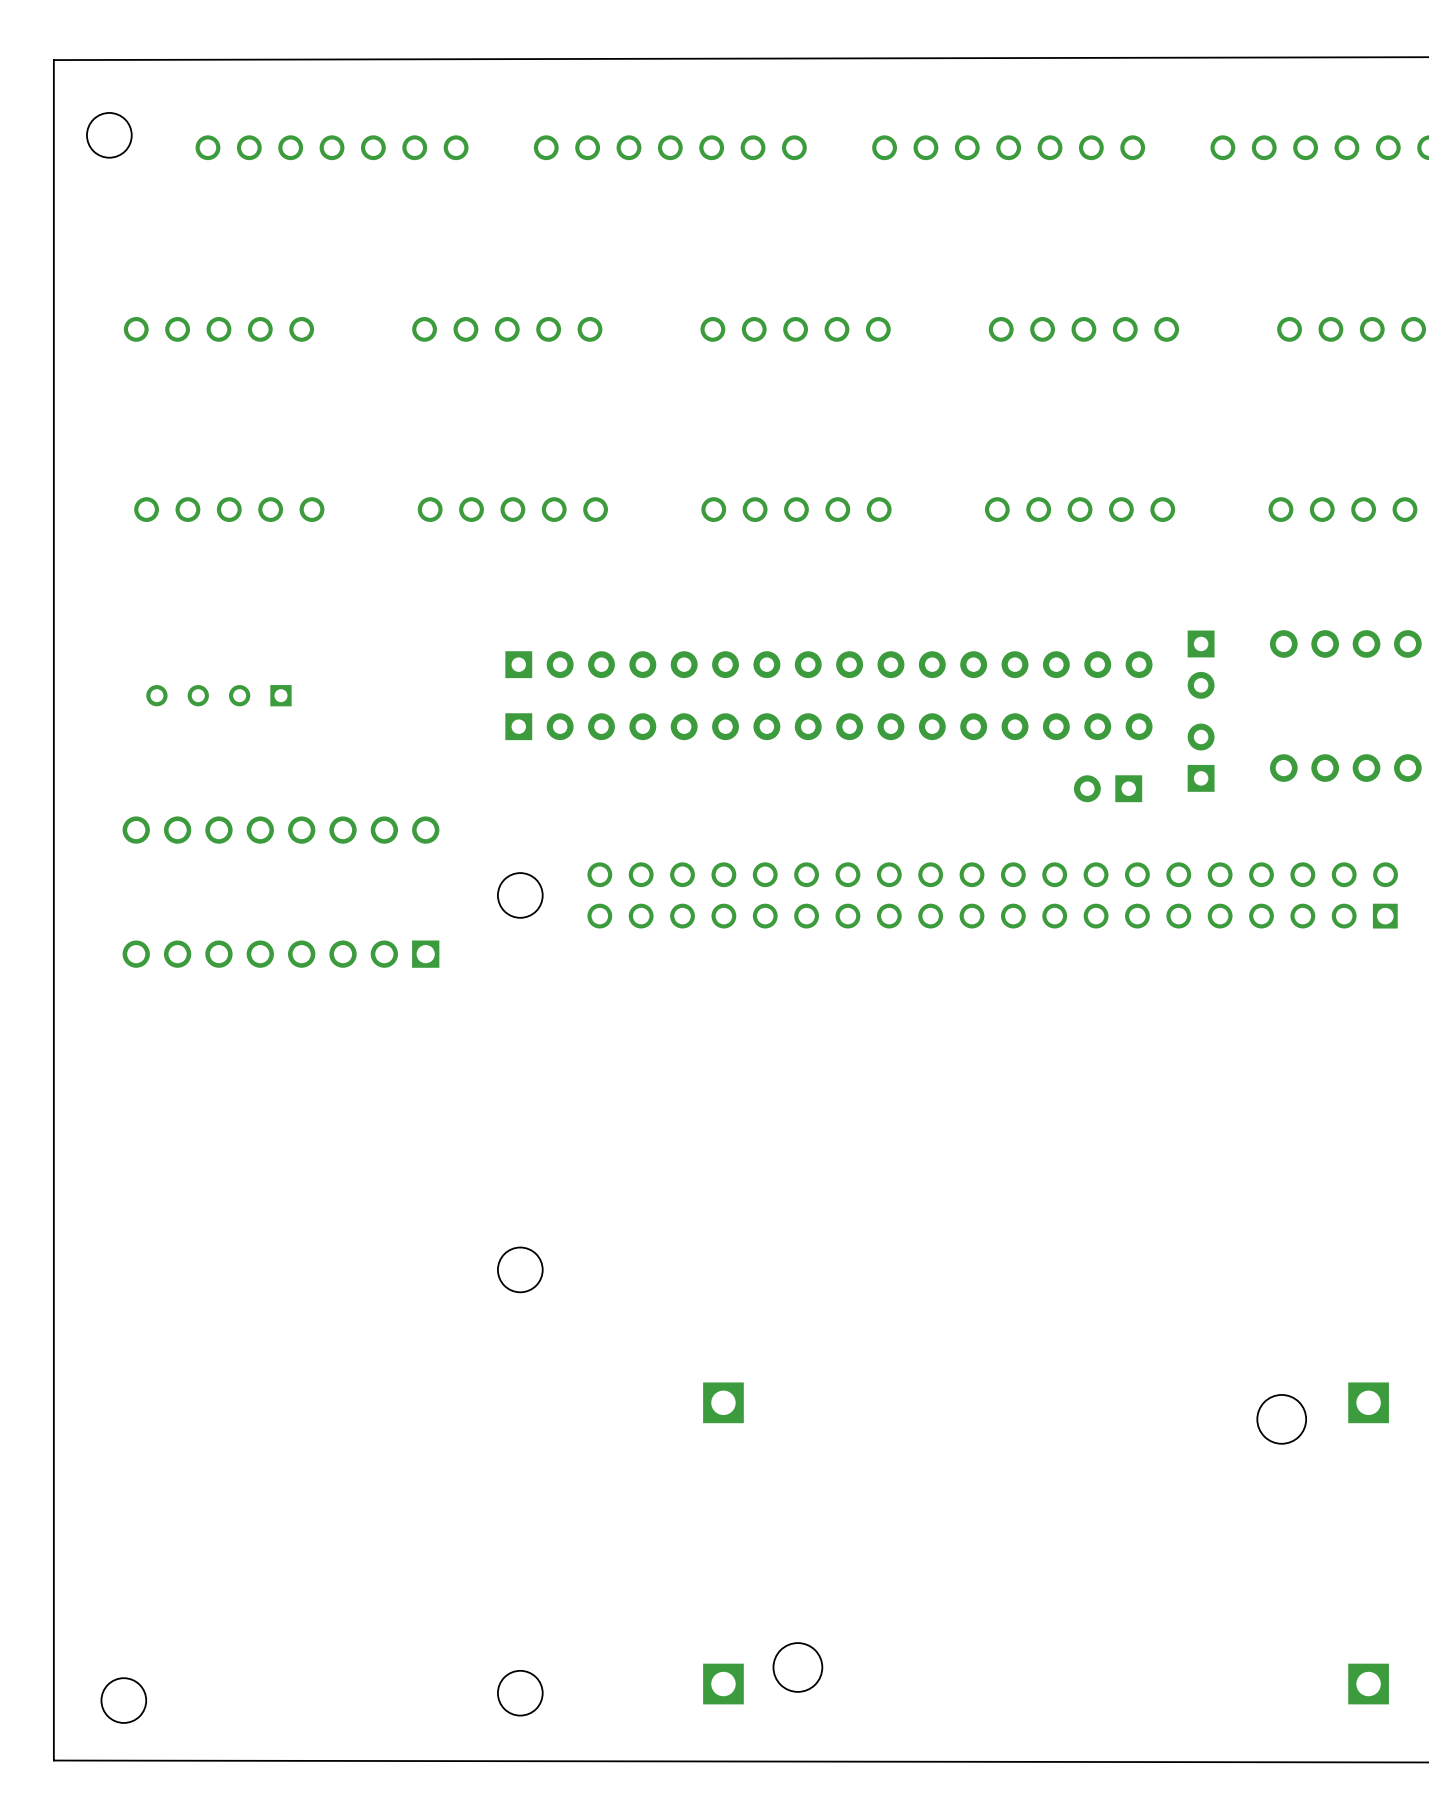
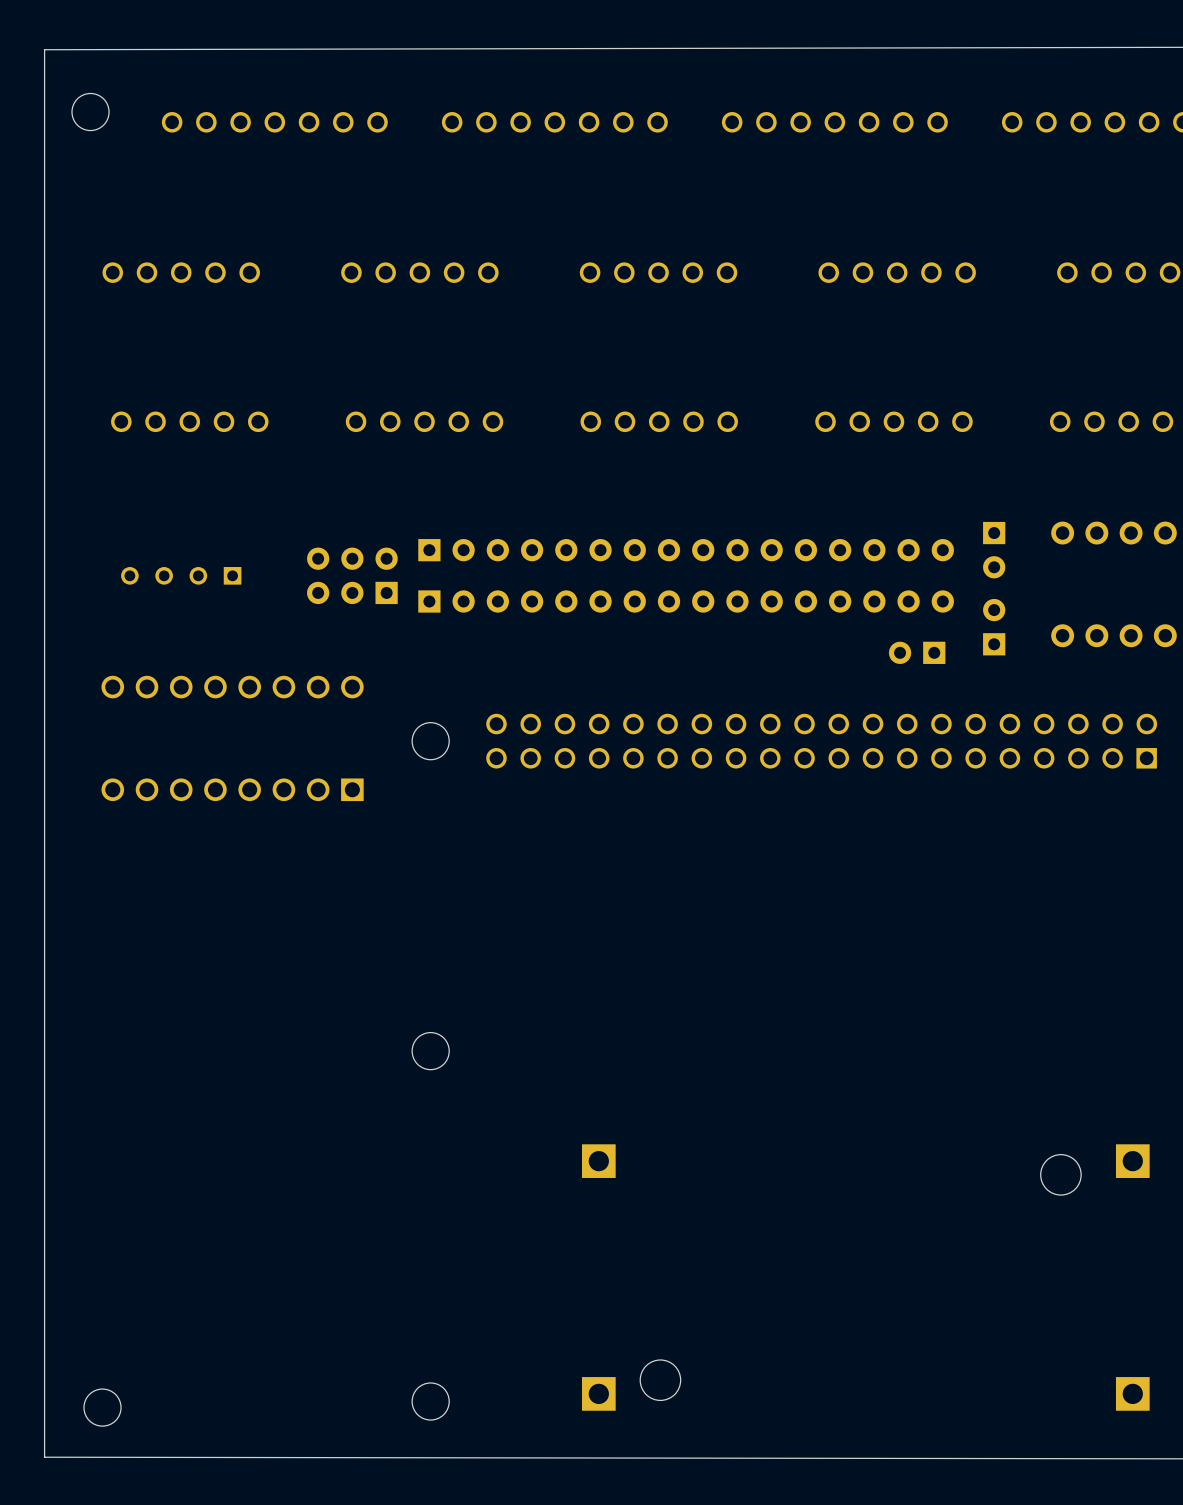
part: none -> (352, 575)

